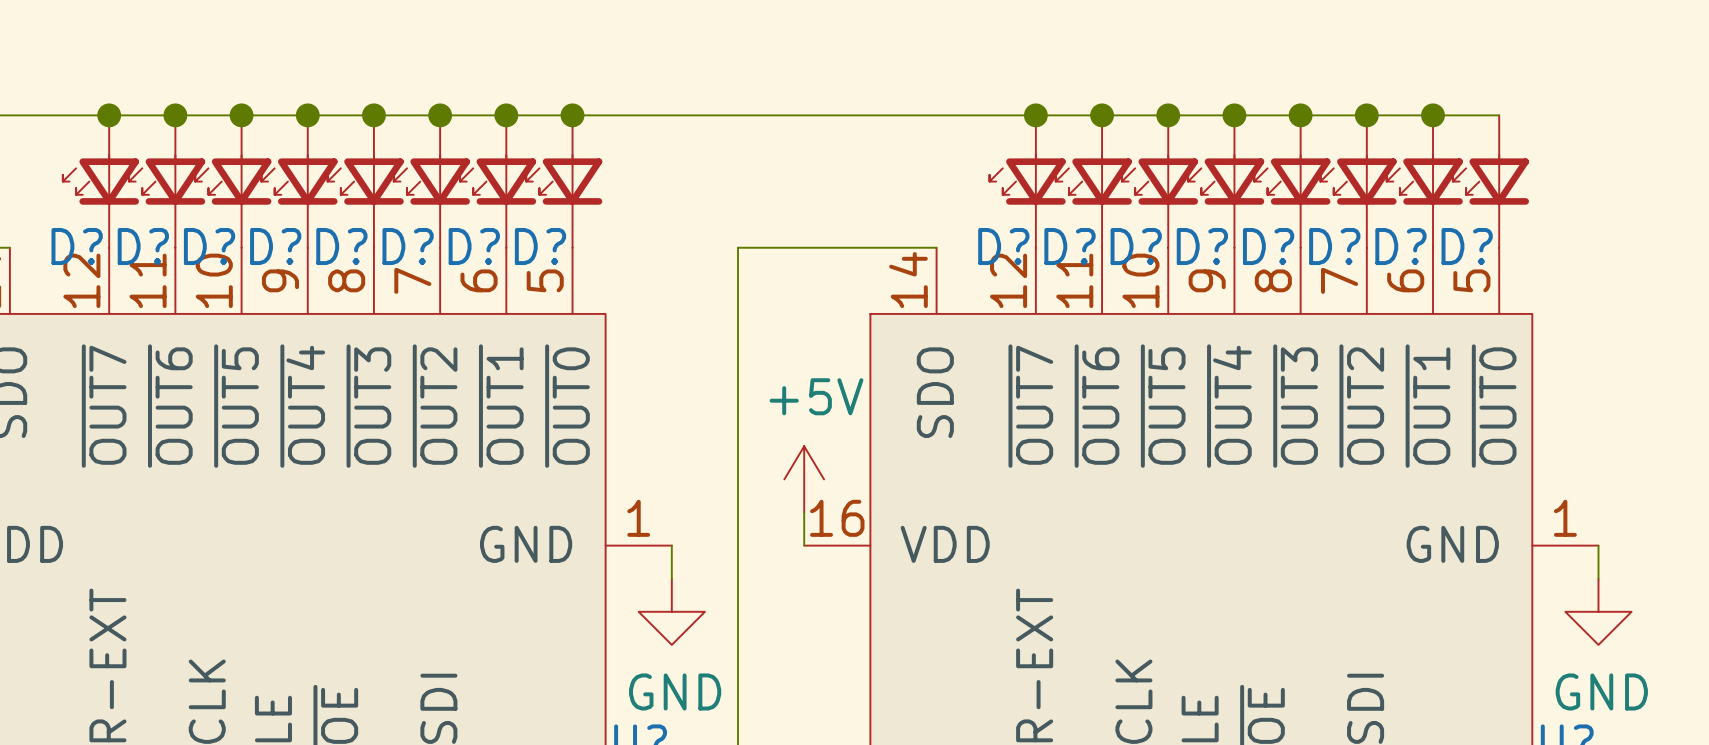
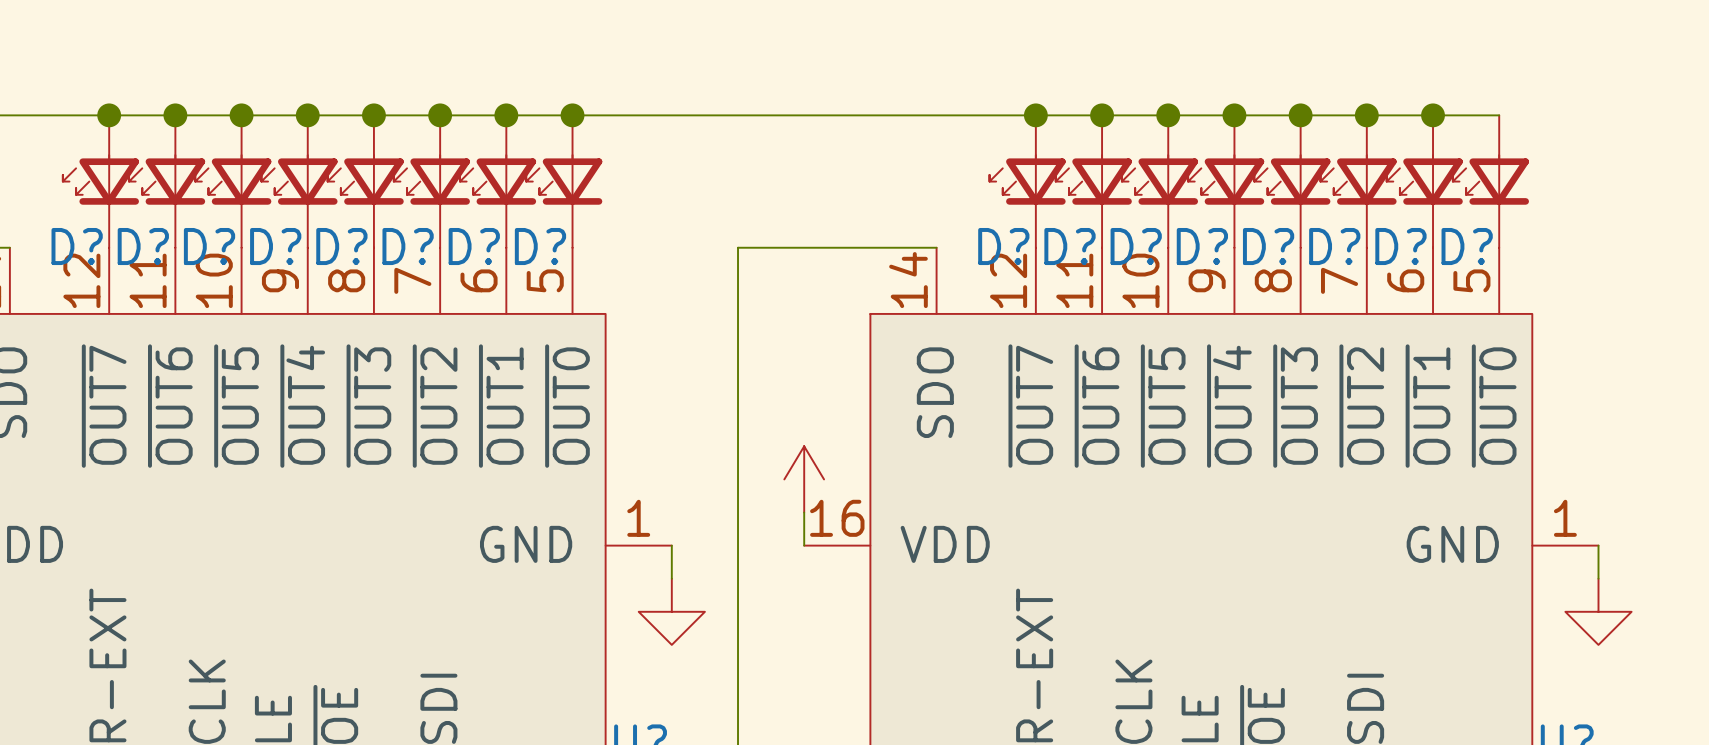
power symbol text: +5V (816, 396) -> none
power symbol text: GND (675, 691) -> none
power symbol text: GND (1601, 691) -> none

